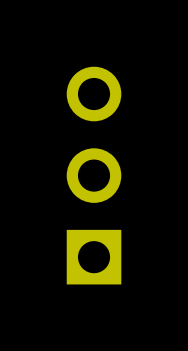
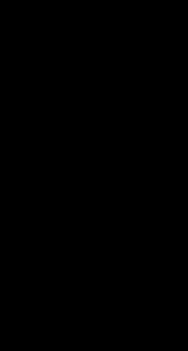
part: (94, 175) -> none

